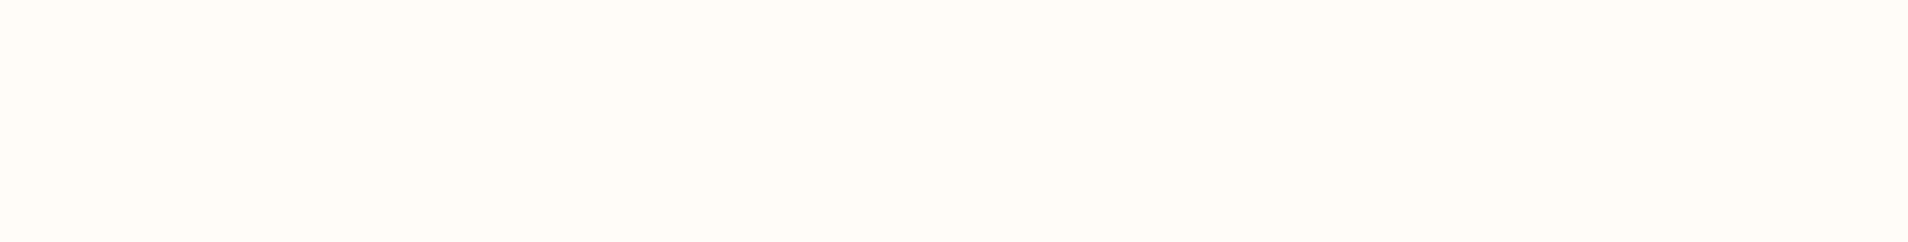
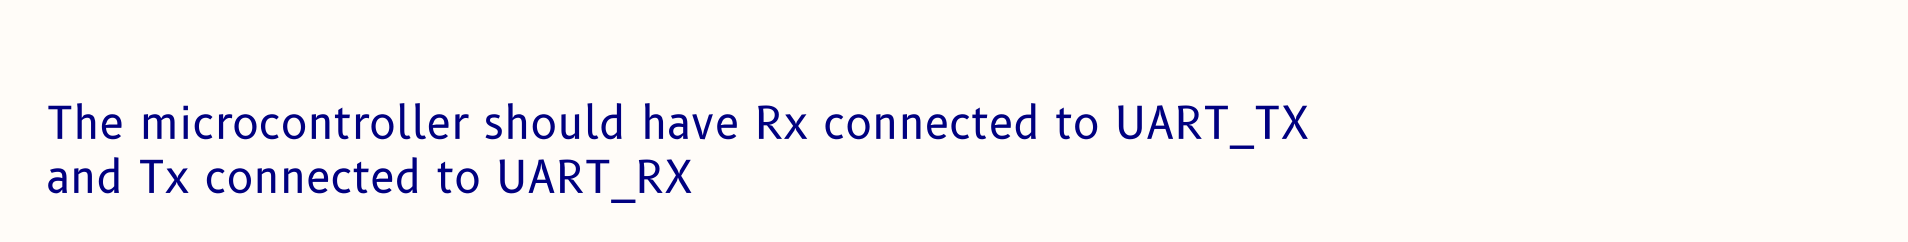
text: none -> The microcontroller should have Rx connected to UART_TX (678, 126)
text: none -> and Tx connected to UART_RX (369, 180)

